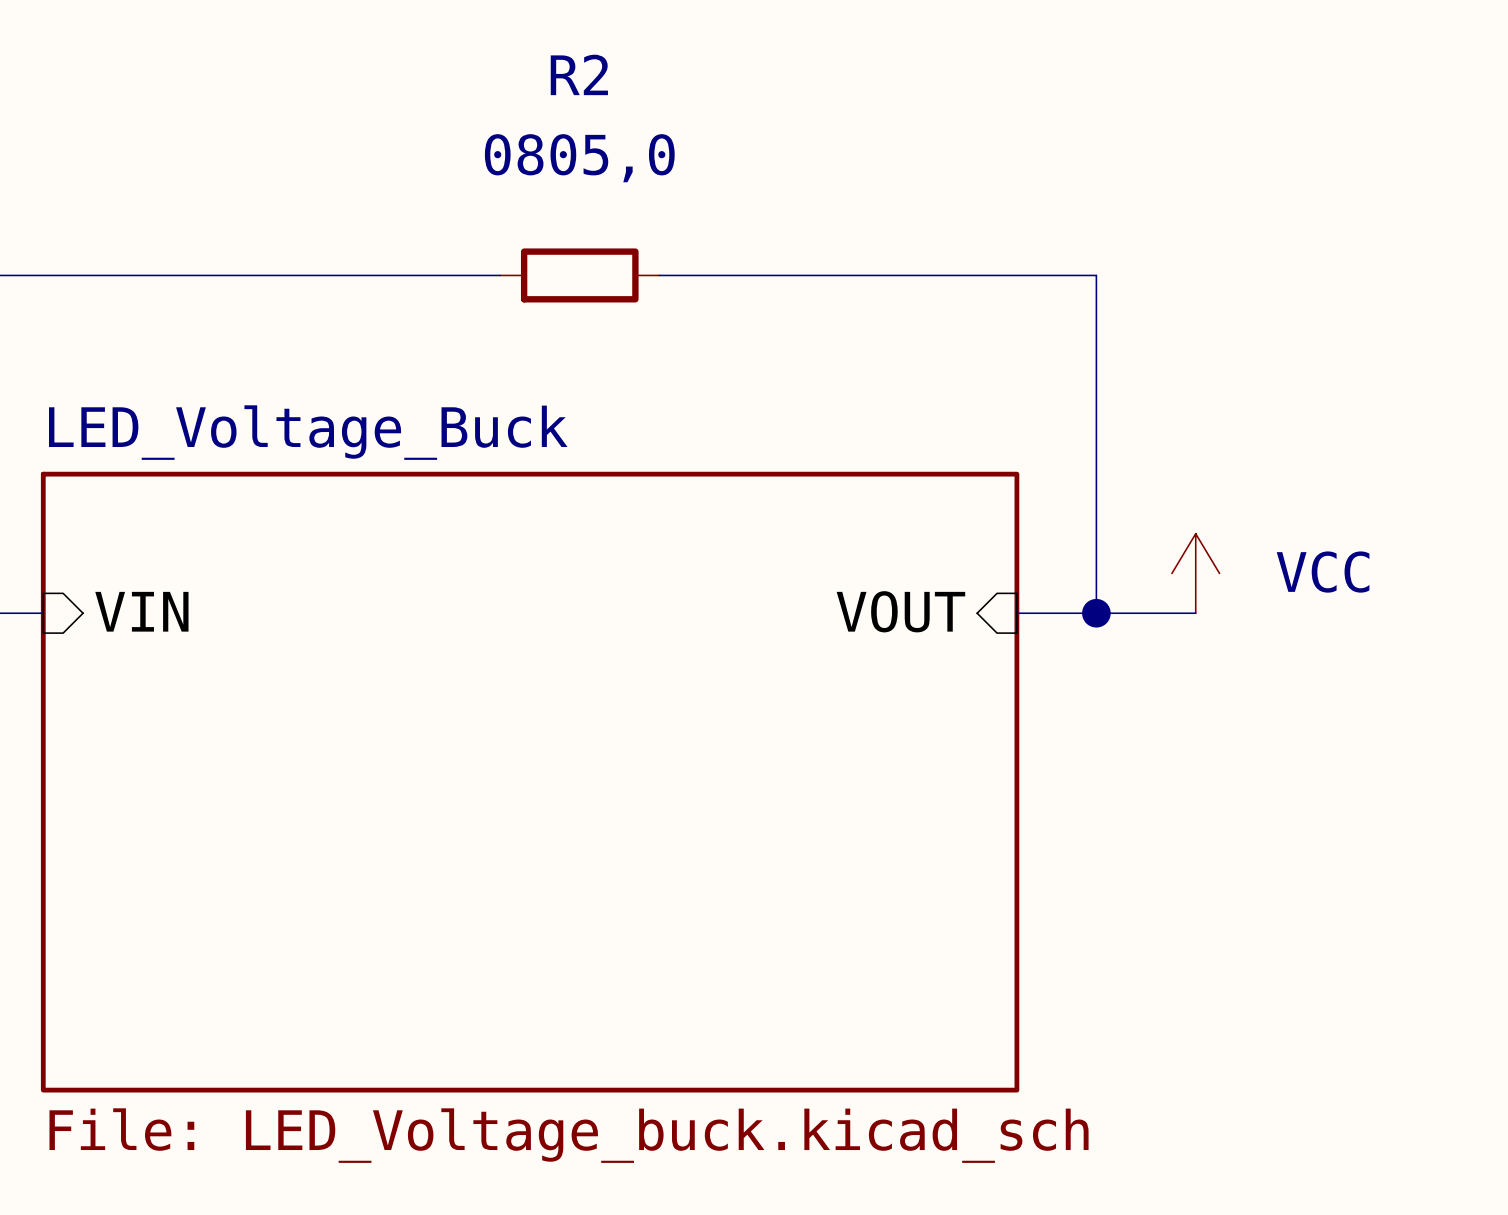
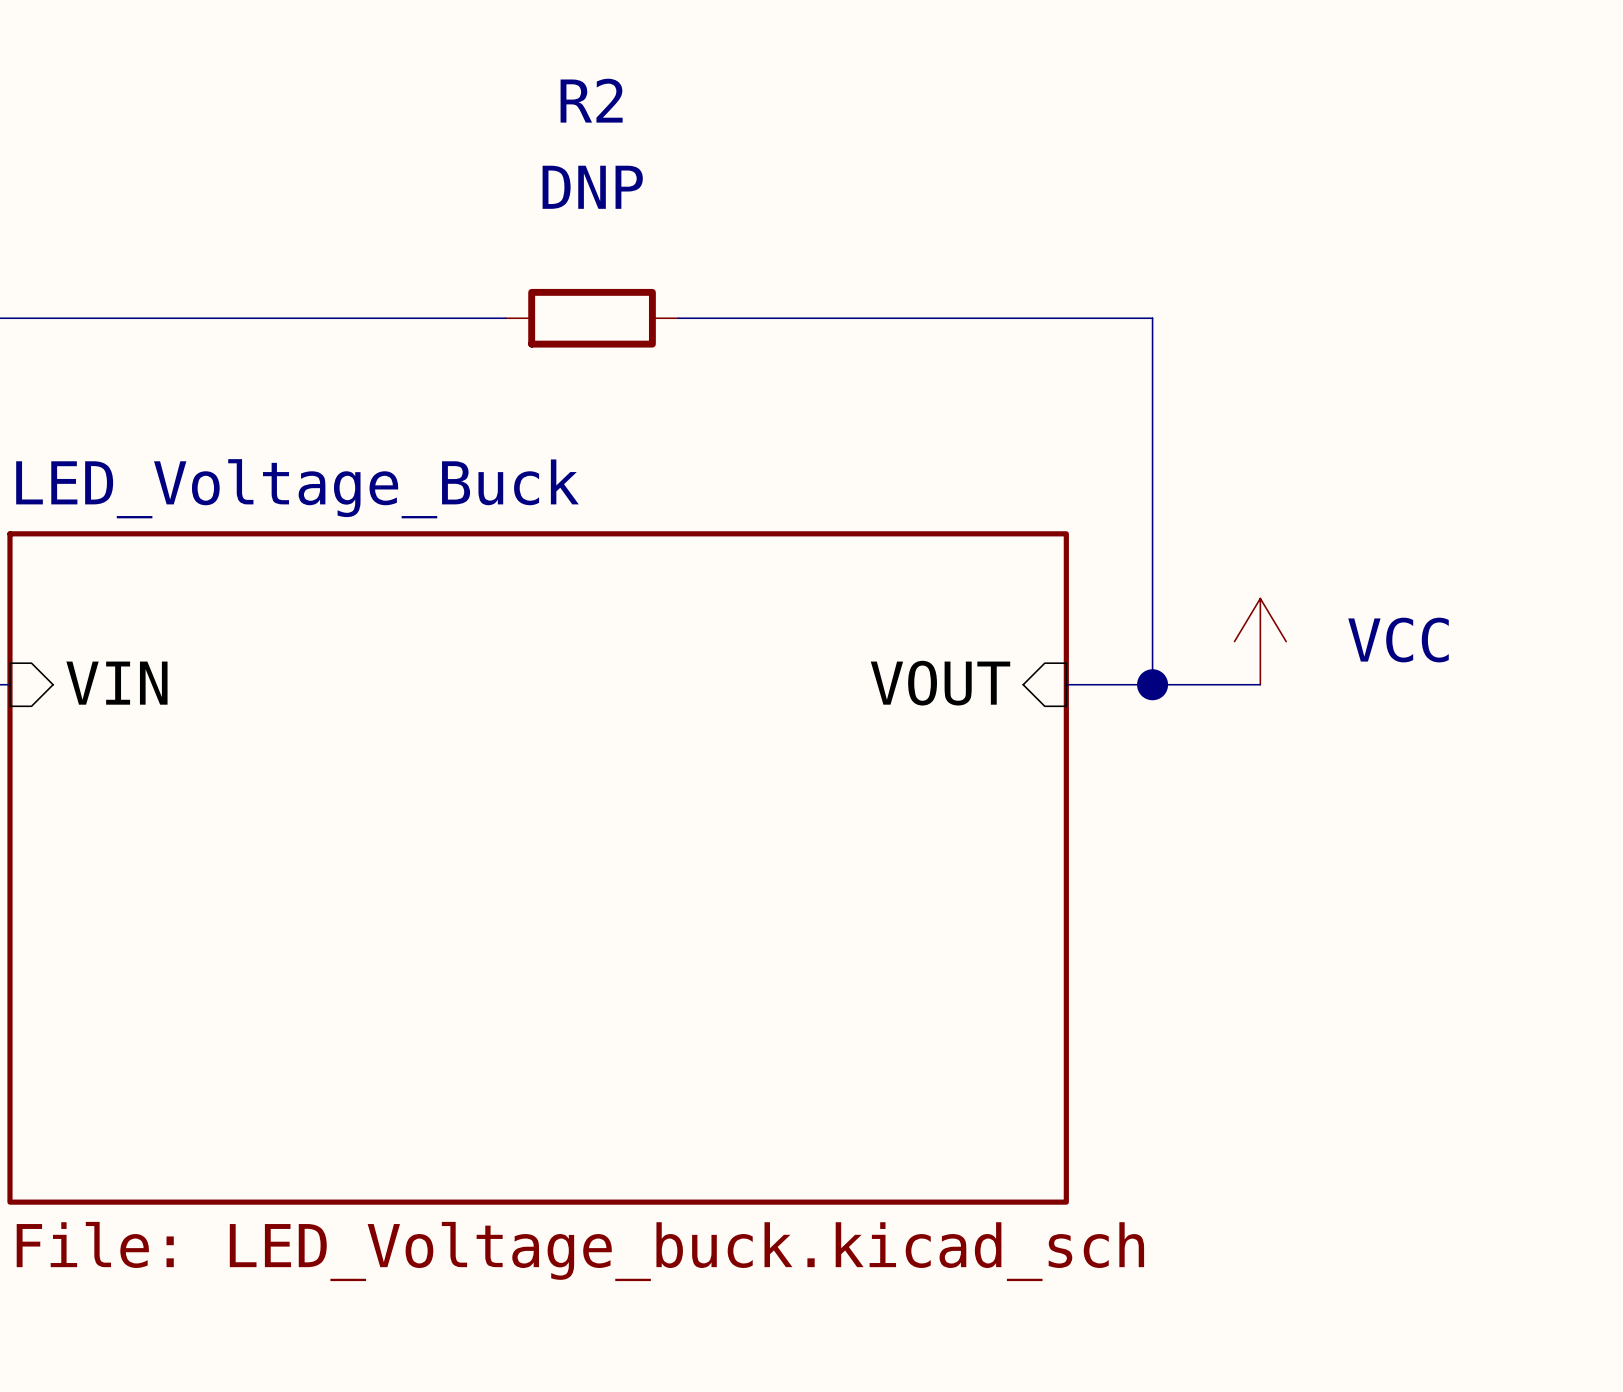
R2 value: 0805,0 (579, 158) -> DNP (592, 187)

